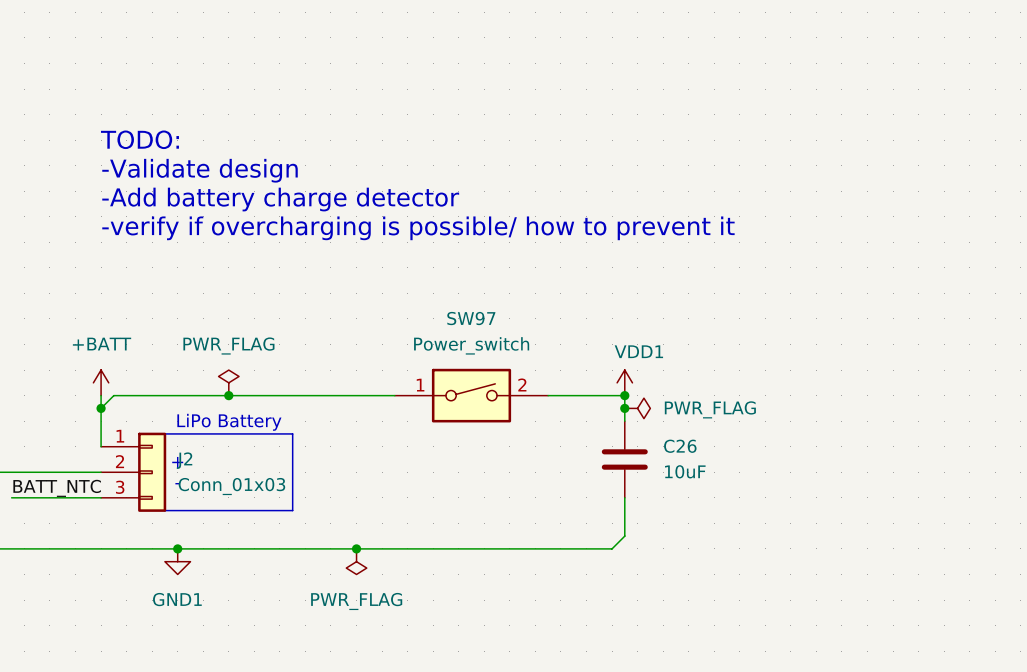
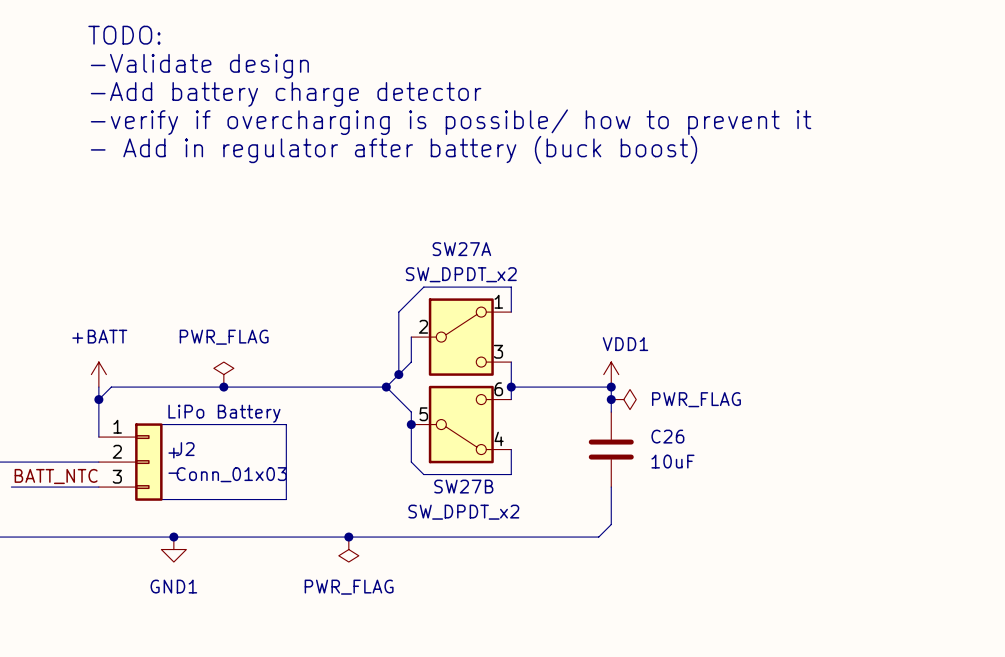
text position: TODO: (139, 139) -> TODO: (124, 35)
text: none -> - Add in regulator after battery (buck boost) (393, 149)
text position: -Validate design (200, 170) -> -Validate design (199, 66)
text position: -Add battery charge detector (280, 199) -> -Add battery charge detector (286, 94)
text position: -verify if overcharging is possible/ how to prevent it (418, 228) -> -verify if overcharging is possible/ how to prevent it (451, 122)
wire: none -> (511, 312) (511, 287) (423, 287) (398, 312) (398, 374)
wire: none -> (411, 337) (411, 362) (386, 387) (411, 412) (411, 462) (423, 474) (511, 474) (511, 449)
SW27A: none -> SW_DPDT_x2 (461, 337)
wire: none -> (511, 362) (511, 399)
junction: none -> (398, 374)
junction: none -> (386, 387)
SW97: Power_switch (471, 395) -> none
junction: none -> (511, 387)
junction: none -> (411, 424)
SW27B: none -> SW_DPDT_x2 (461, 424)

